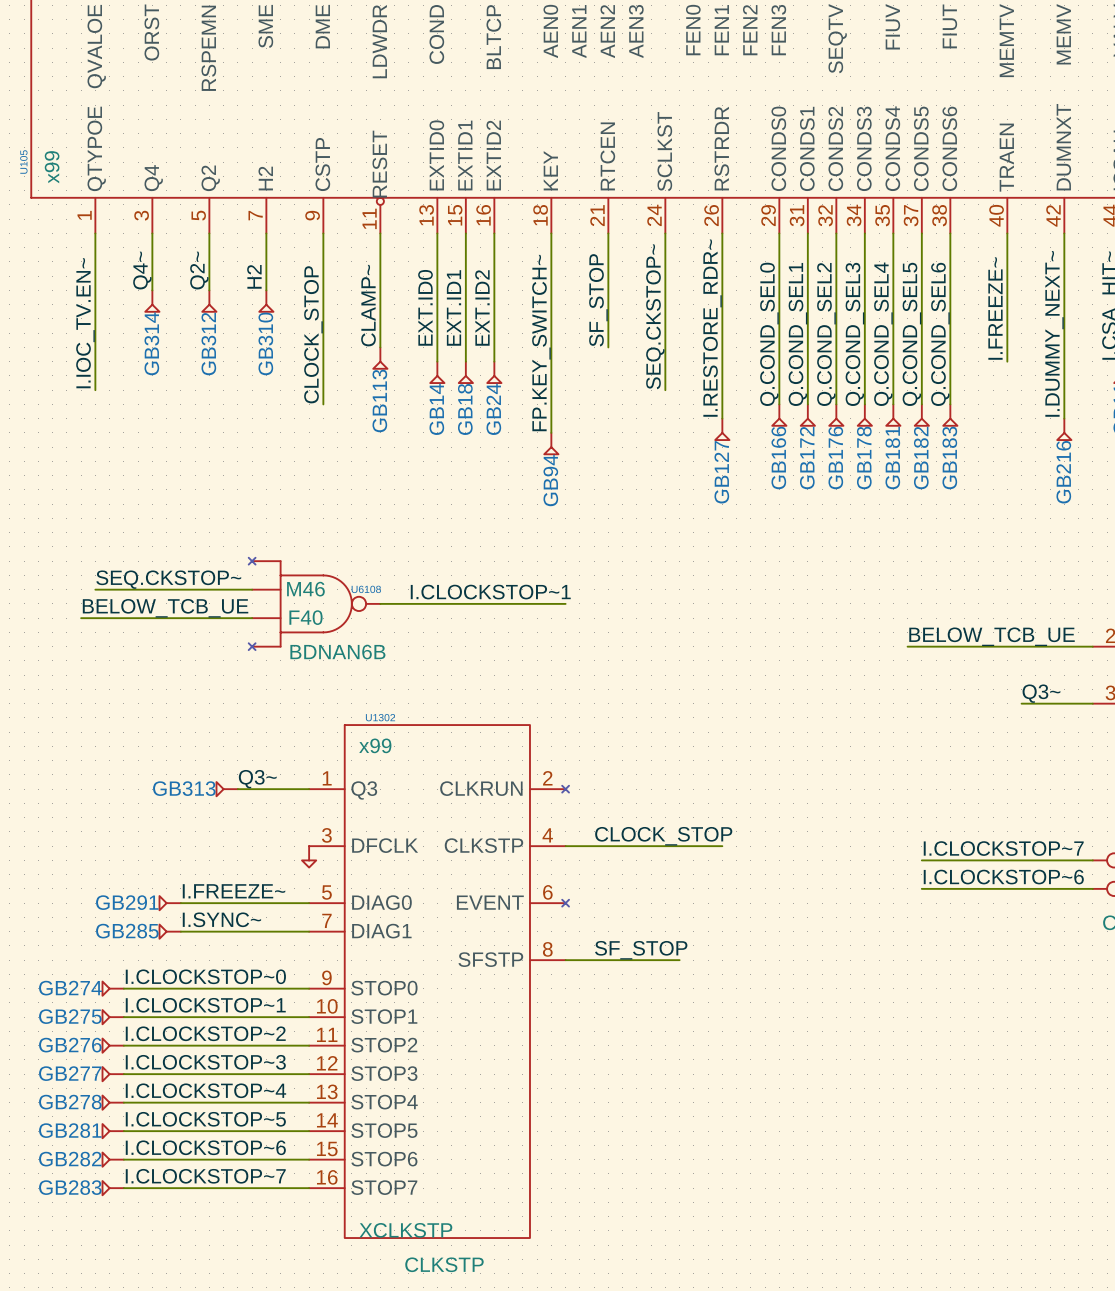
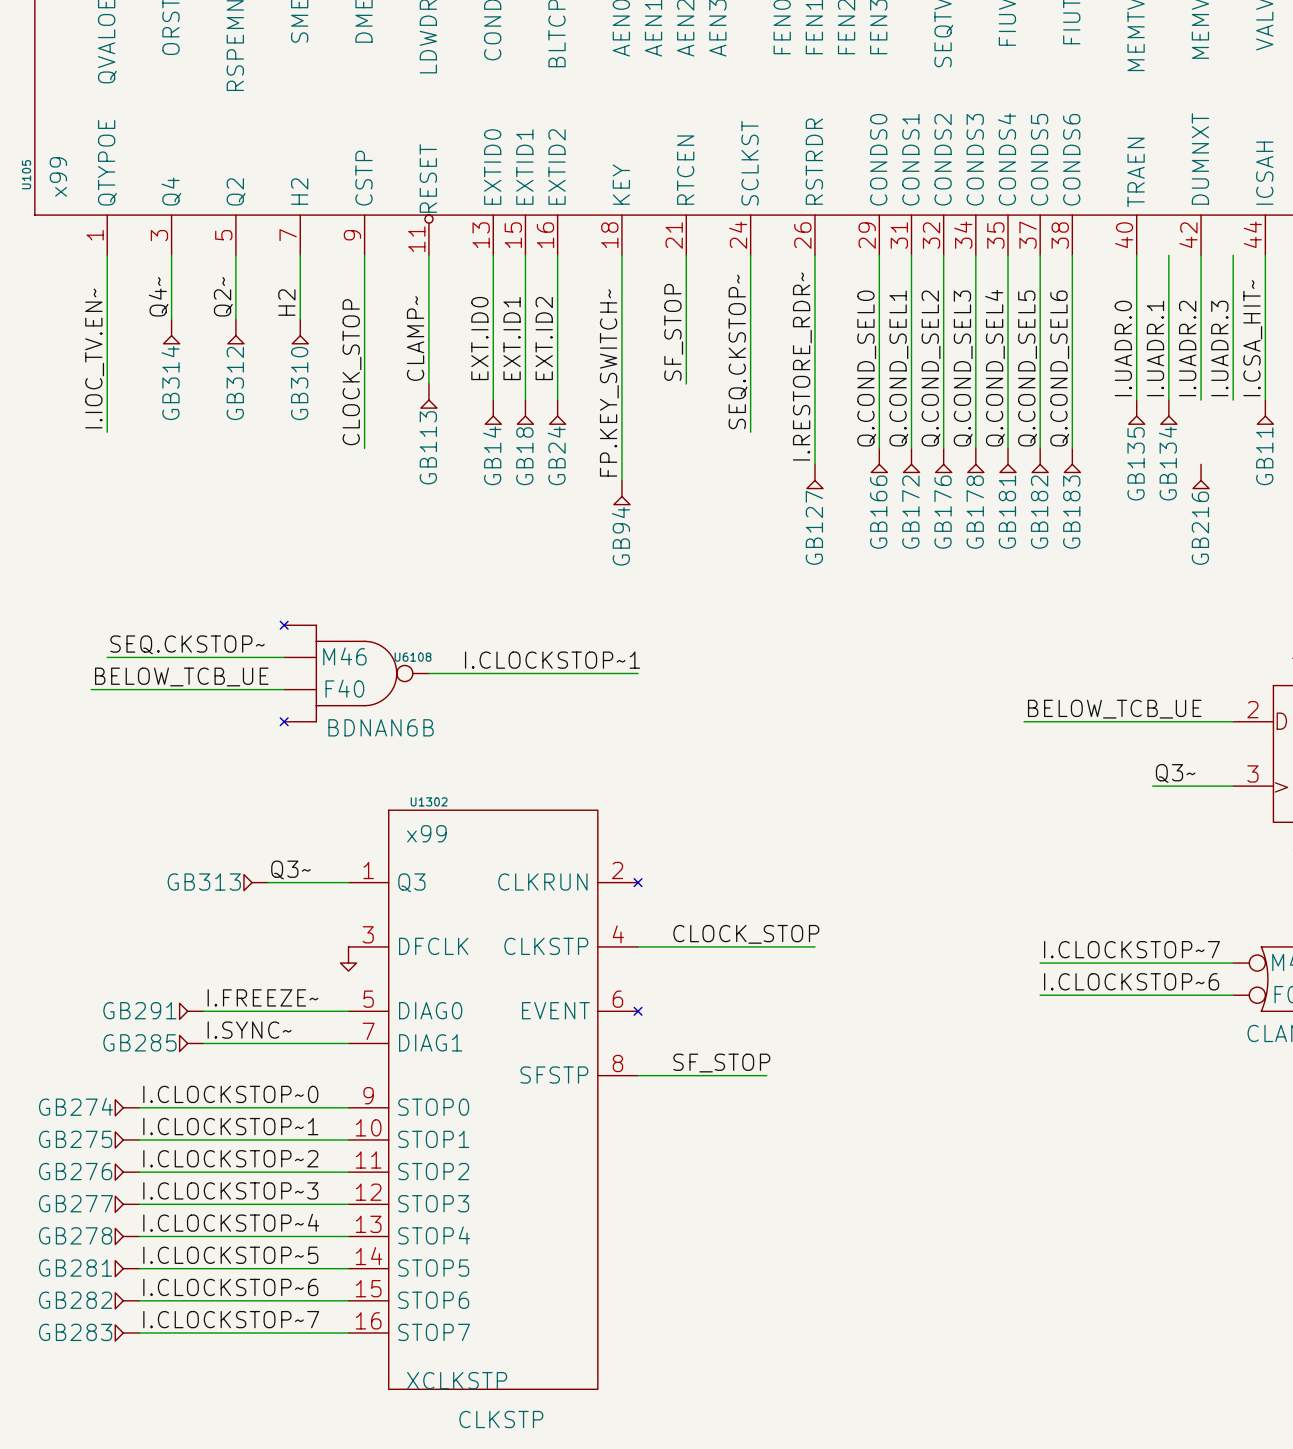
wire: none -> (1168, 255) (1168, 400)
wire: none -> (1233, 255) (1233, 400)
label: I.FREEZE~ (995, 308) -> I.UADR.0 (1123, 348)
label: none -> I.UADR.1 (1155, 348)
label: none -> I.UADR.2 (1187, 348)
label: none -> I.UADR.3 (1219, 348)
label: I.DUMMY_NEXT~ (1054, 333) -> none
wire: (1064, 361) (1064, 418) -> none
GB135: none -> (1136, 412)
GB134: none -> (1168, 412)

